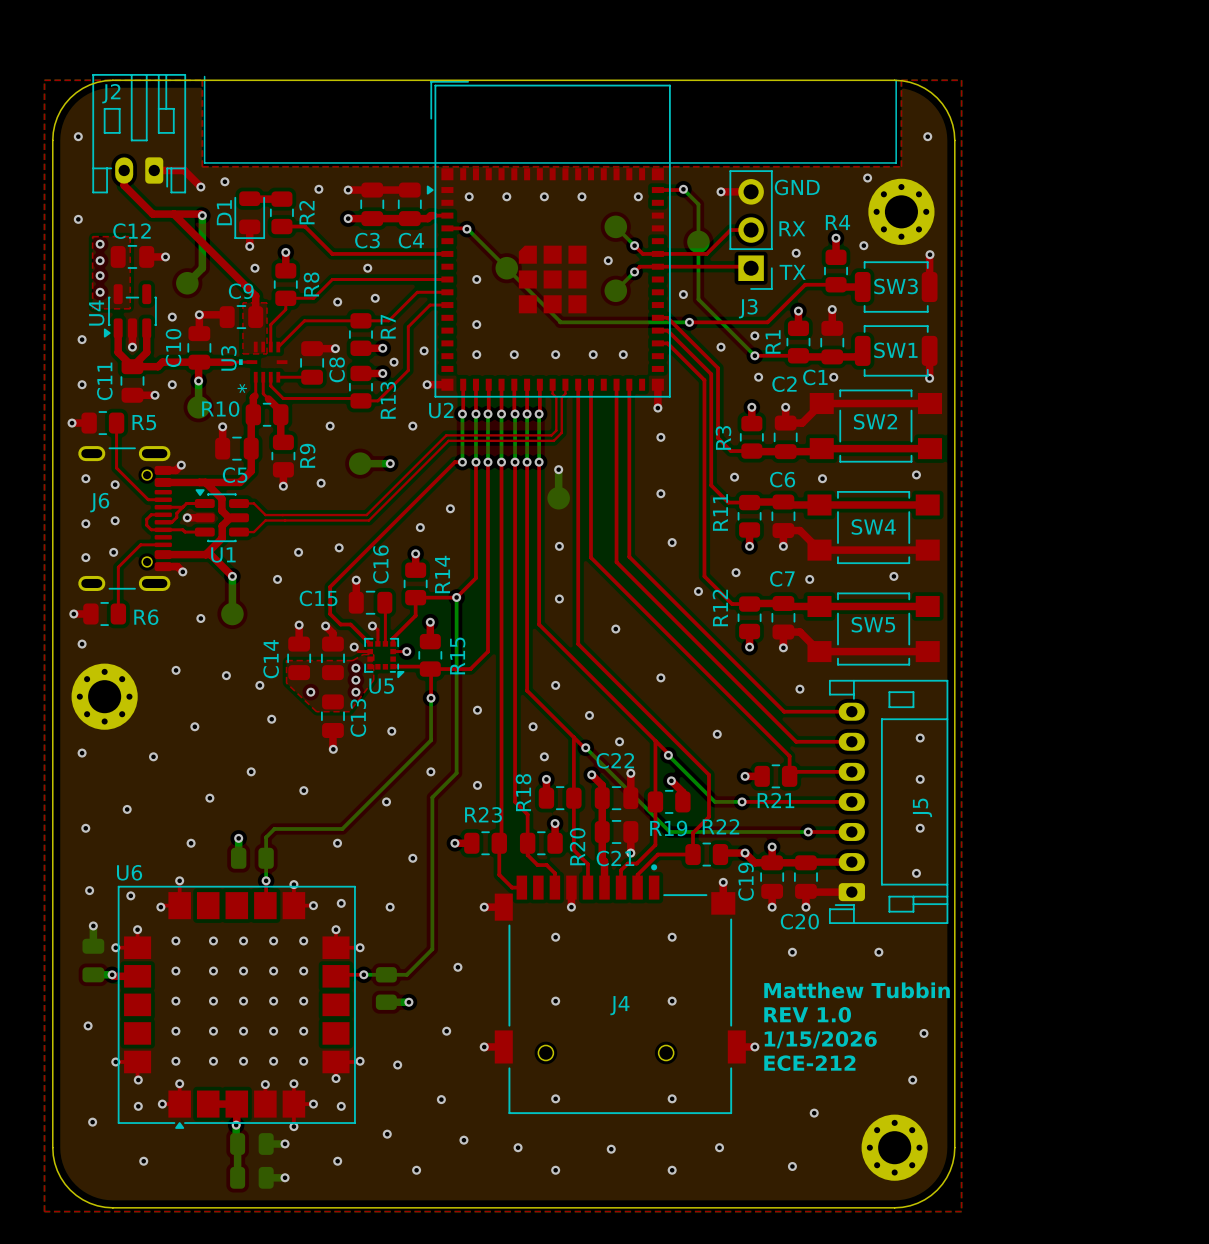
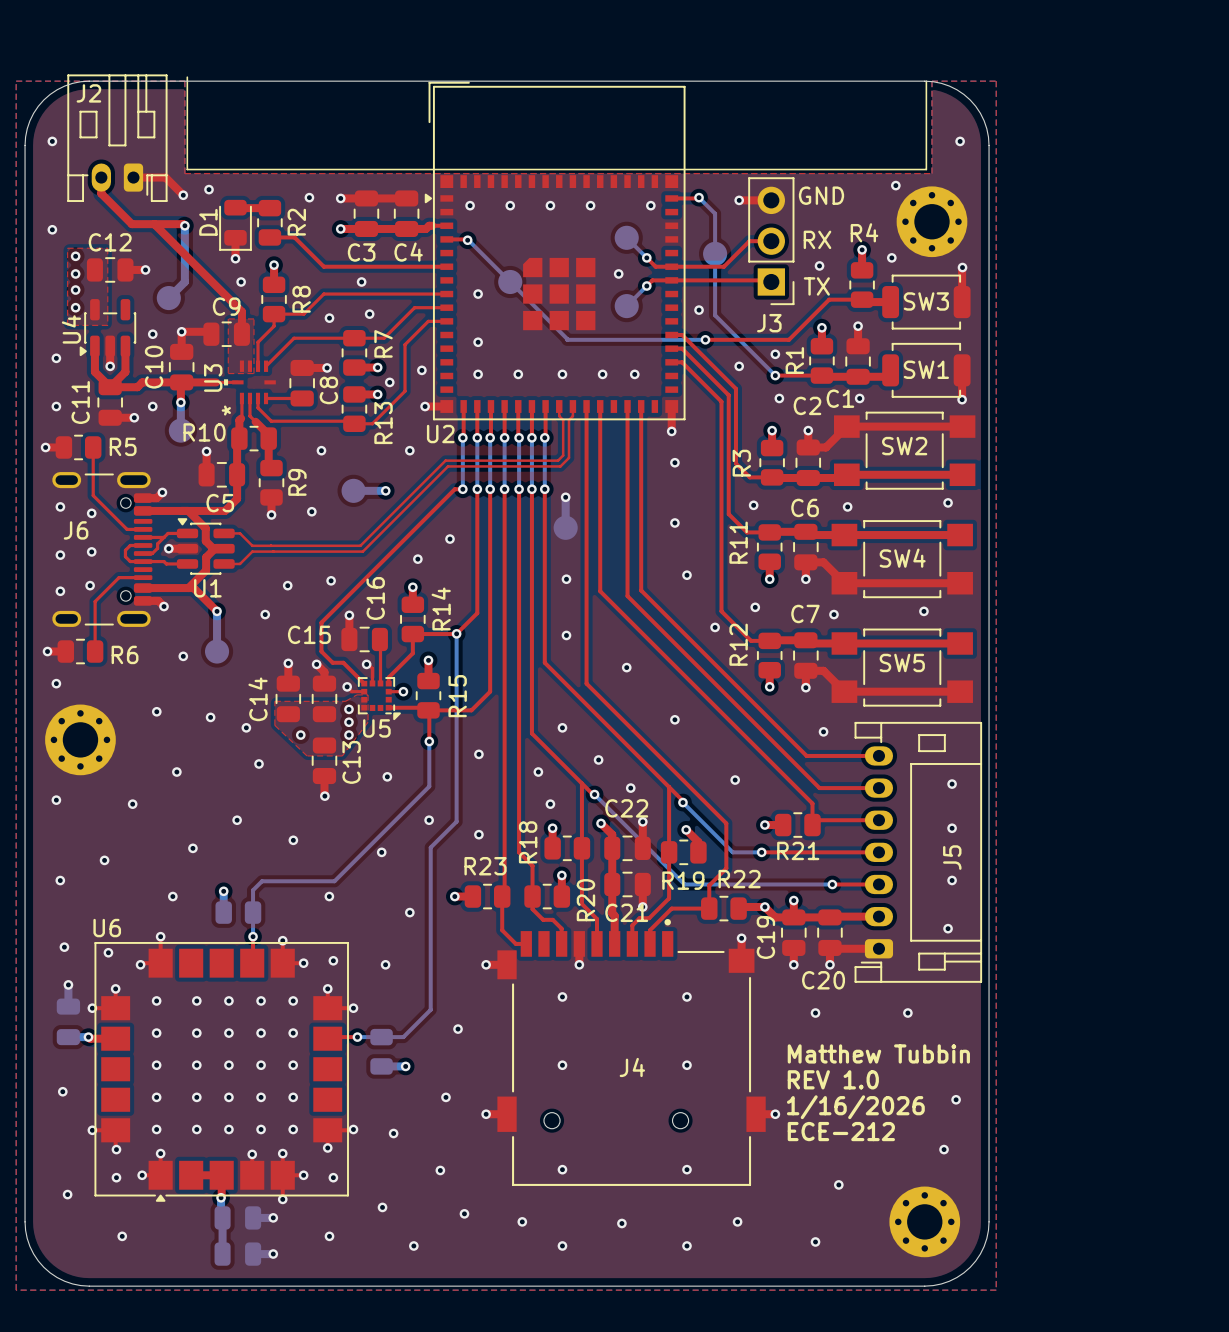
text: 1/15/2026 (820, 1039) -> 1/16/2026 (855, 1107)

